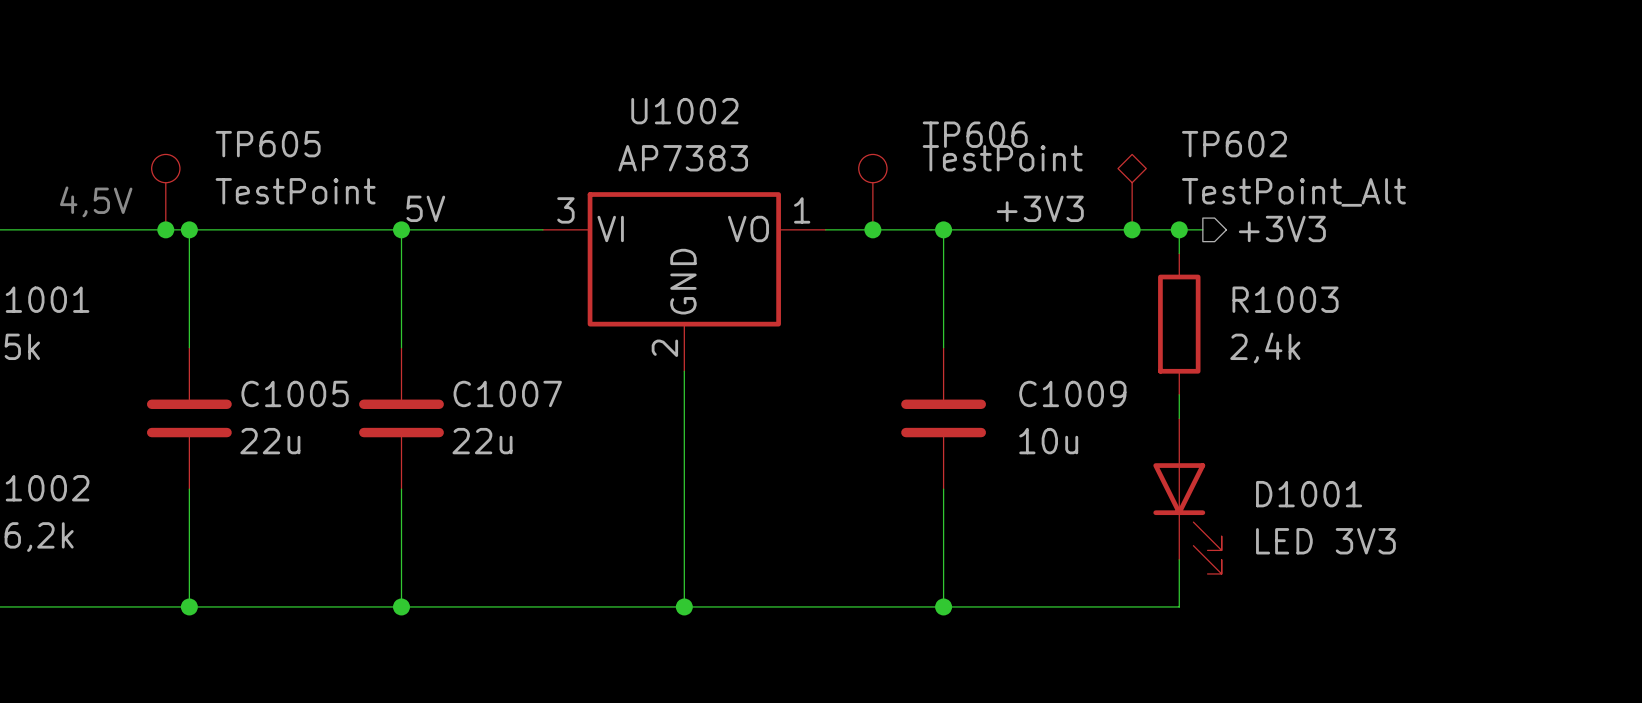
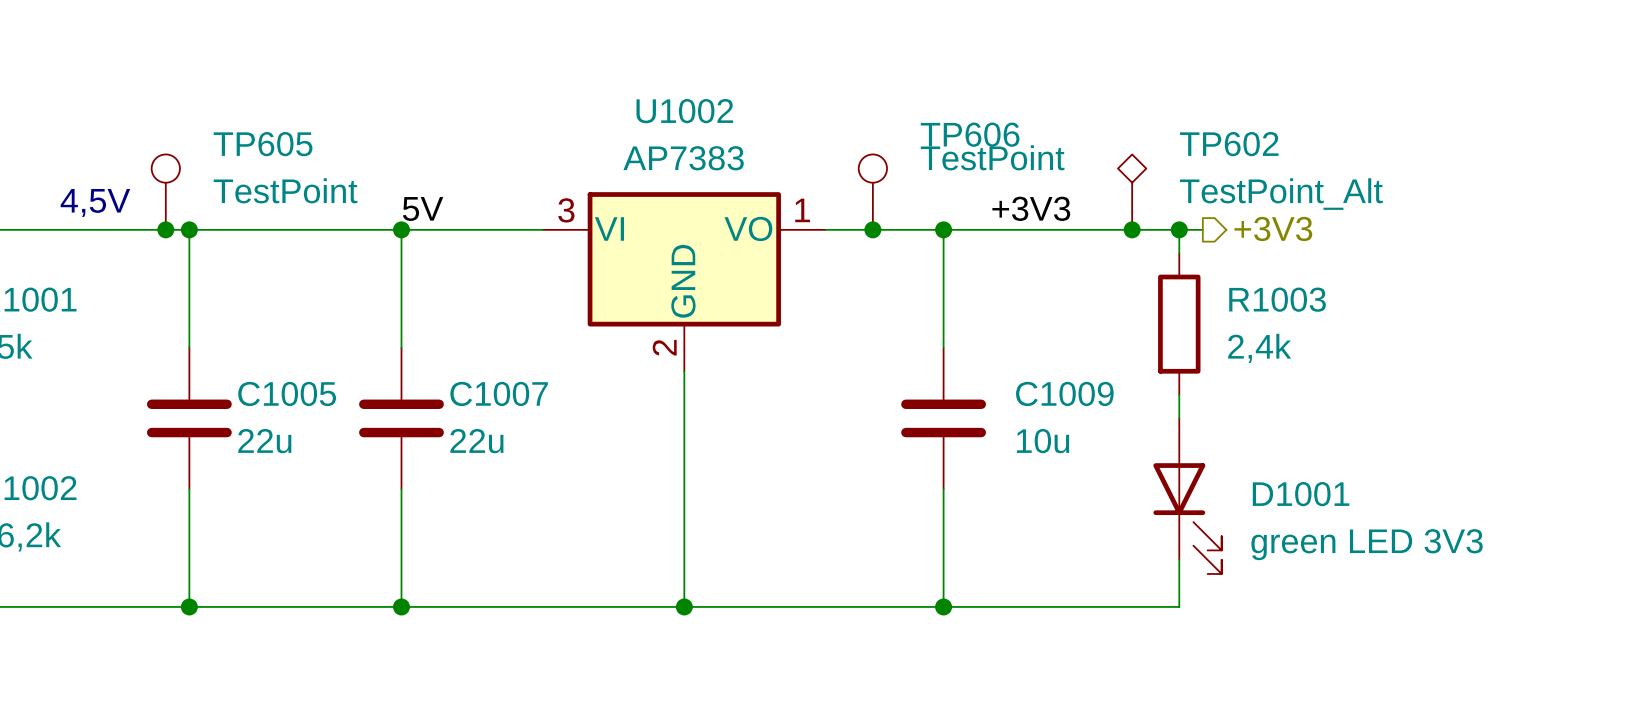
D1001 value: LED 3V3 (1325, 541) -> green LED 3V3 (1367, 544)

